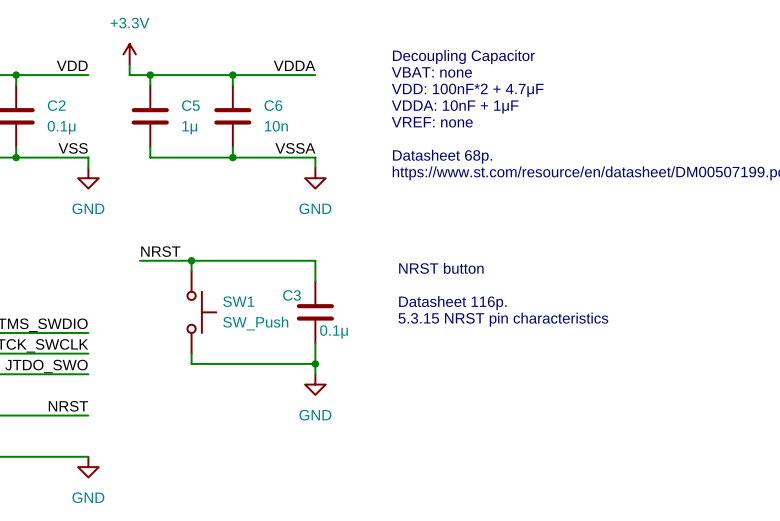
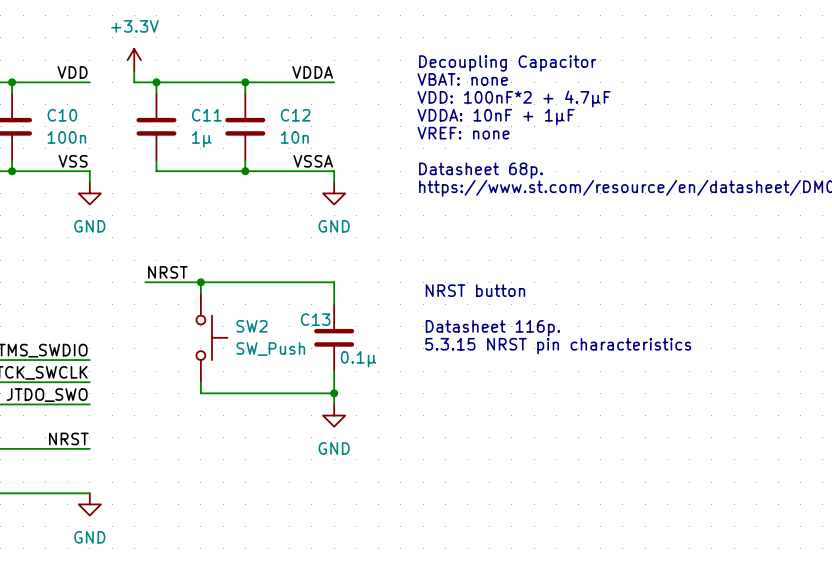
C2 name: C2 (56, 105) -> C10 (62, 115)
C5 name: C5 (190, 105) -> C11 (206, 115)
C6 name: C6 (273, 105) -> C12 (295, 115)
C2 value: 0.1μ (61, 127) -> 100n (66, 137)
C3 name: C3 (292, 295) -> C13 (315, 319)
SW1 name: SW1 (238, 301) -> SW2 (252, 326)

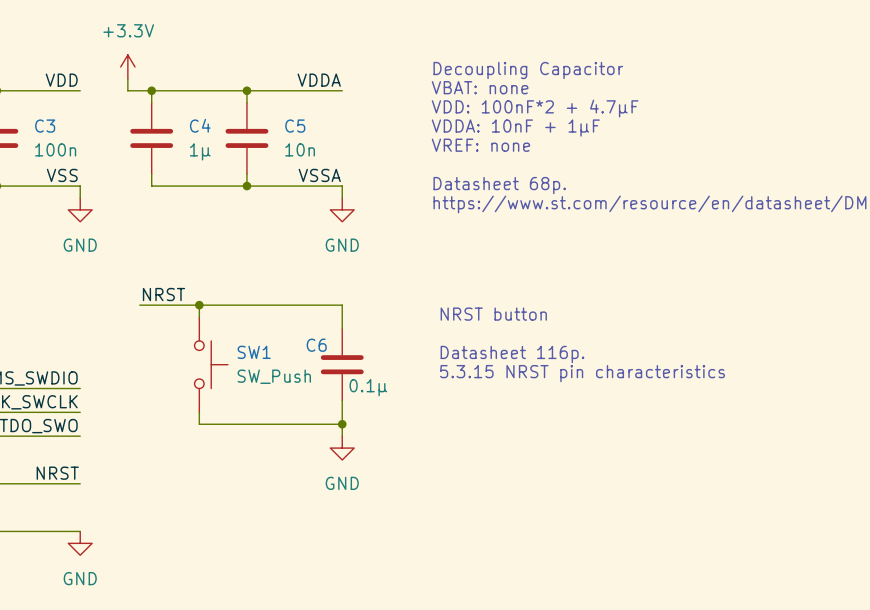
C10 name: C10 (62, 115) -> C3 (45, 126)
C11 name: C11 (206, 115) -> C4 (200, 125)
C12 name: C12 (295, 115) -> C5 (295, 126)
C13 name: C13 (315, 319) -> C6 (316, 345)
SW2 name: SW2 (252, 326) -> SW1 (254, 352)

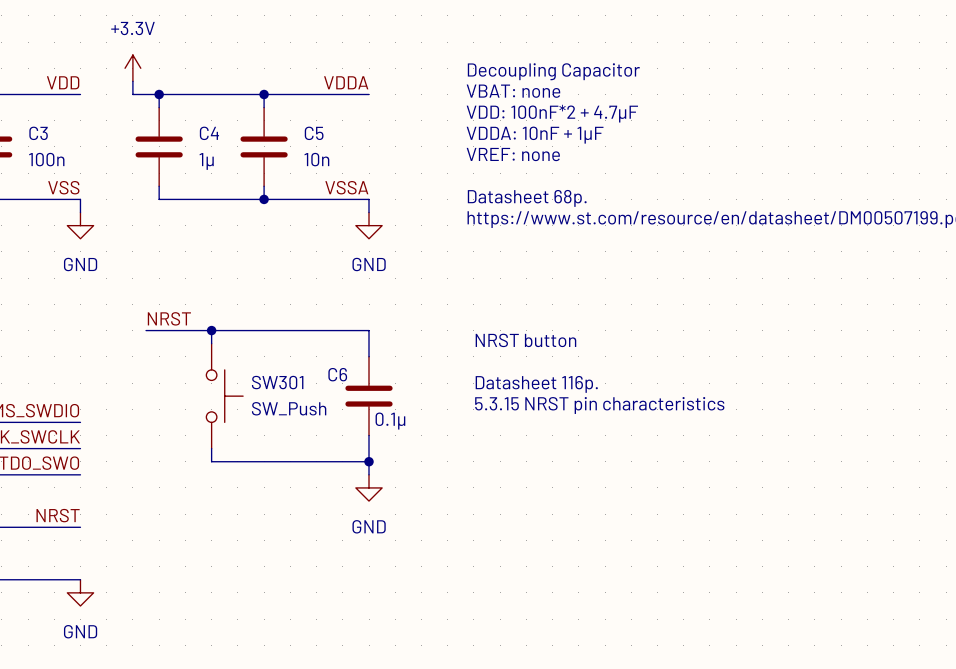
SW1 name: SW1 (254, 352) -> SW301 (277, 382)

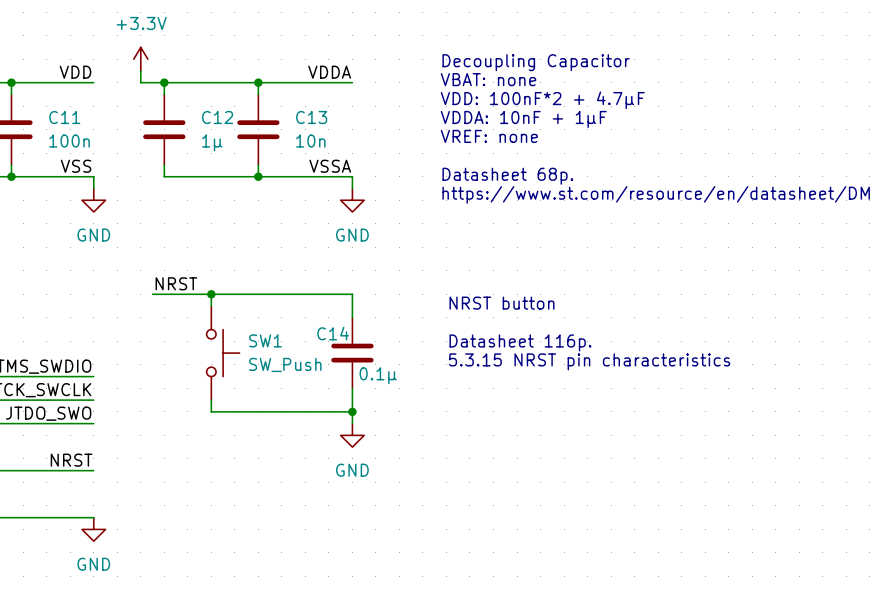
C3 name: C3 (38, 133) -> C11 (64, 117)
C4 name: C4 (209, 133) -> C12 (217, 117)
C5 name: C5 (314, 133) -> C13 (311, 117)
C6 name: C6 (337, 374) -> C14 (333, 333)
SW301 name: SW301 (277, 382) -> SW1 (265, 340)

